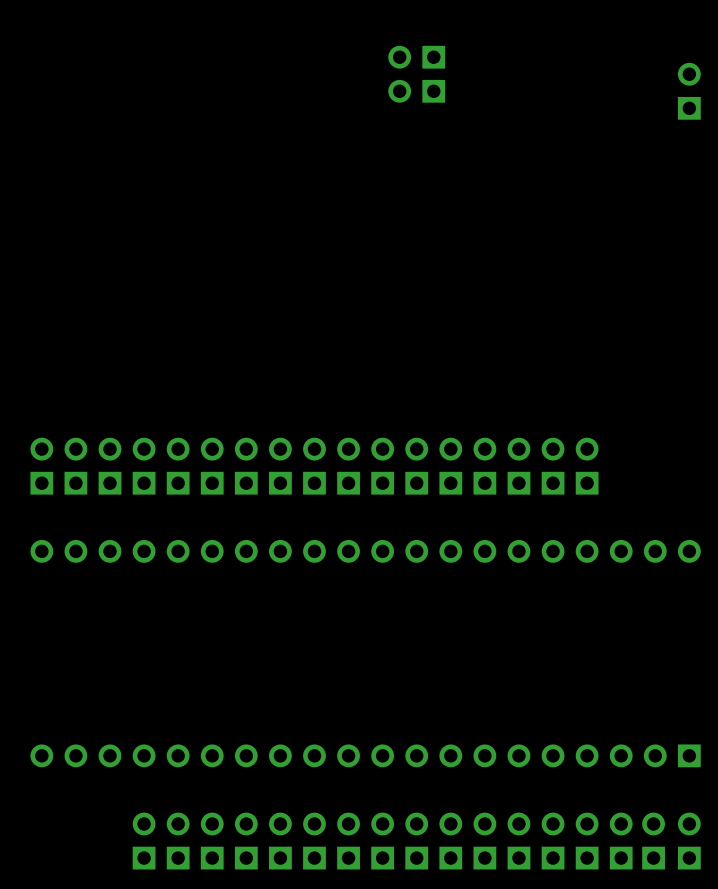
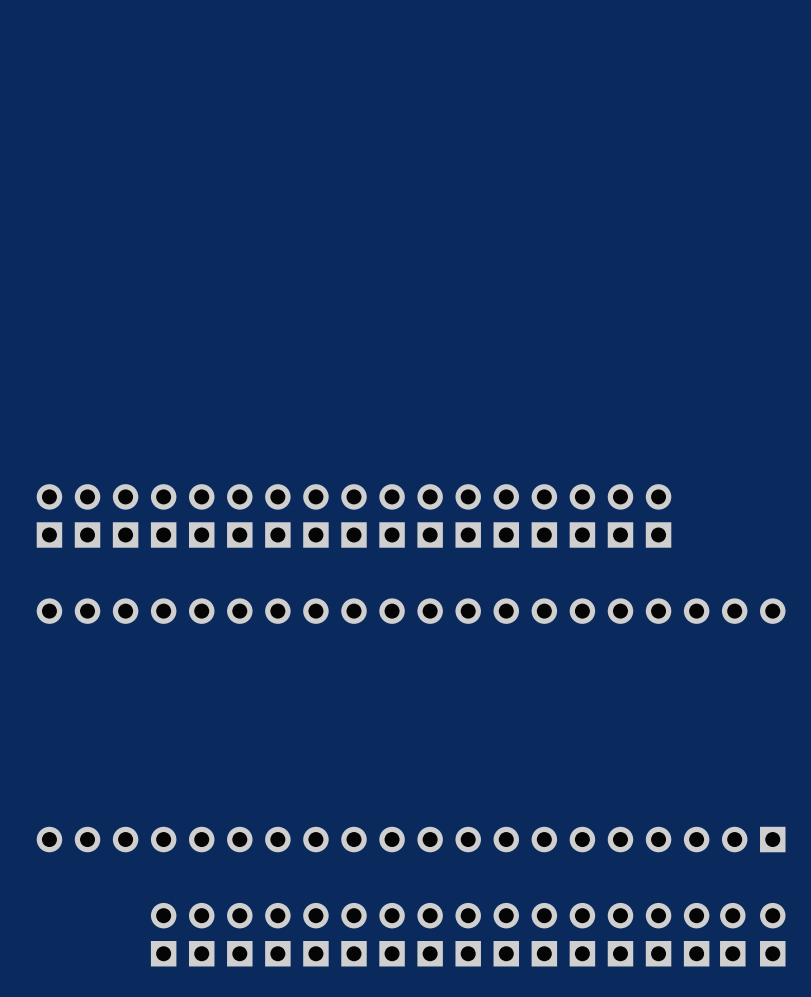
part: (416, 57) -> none
part: (416, 91) -> none
part: (689, 91) -> none

